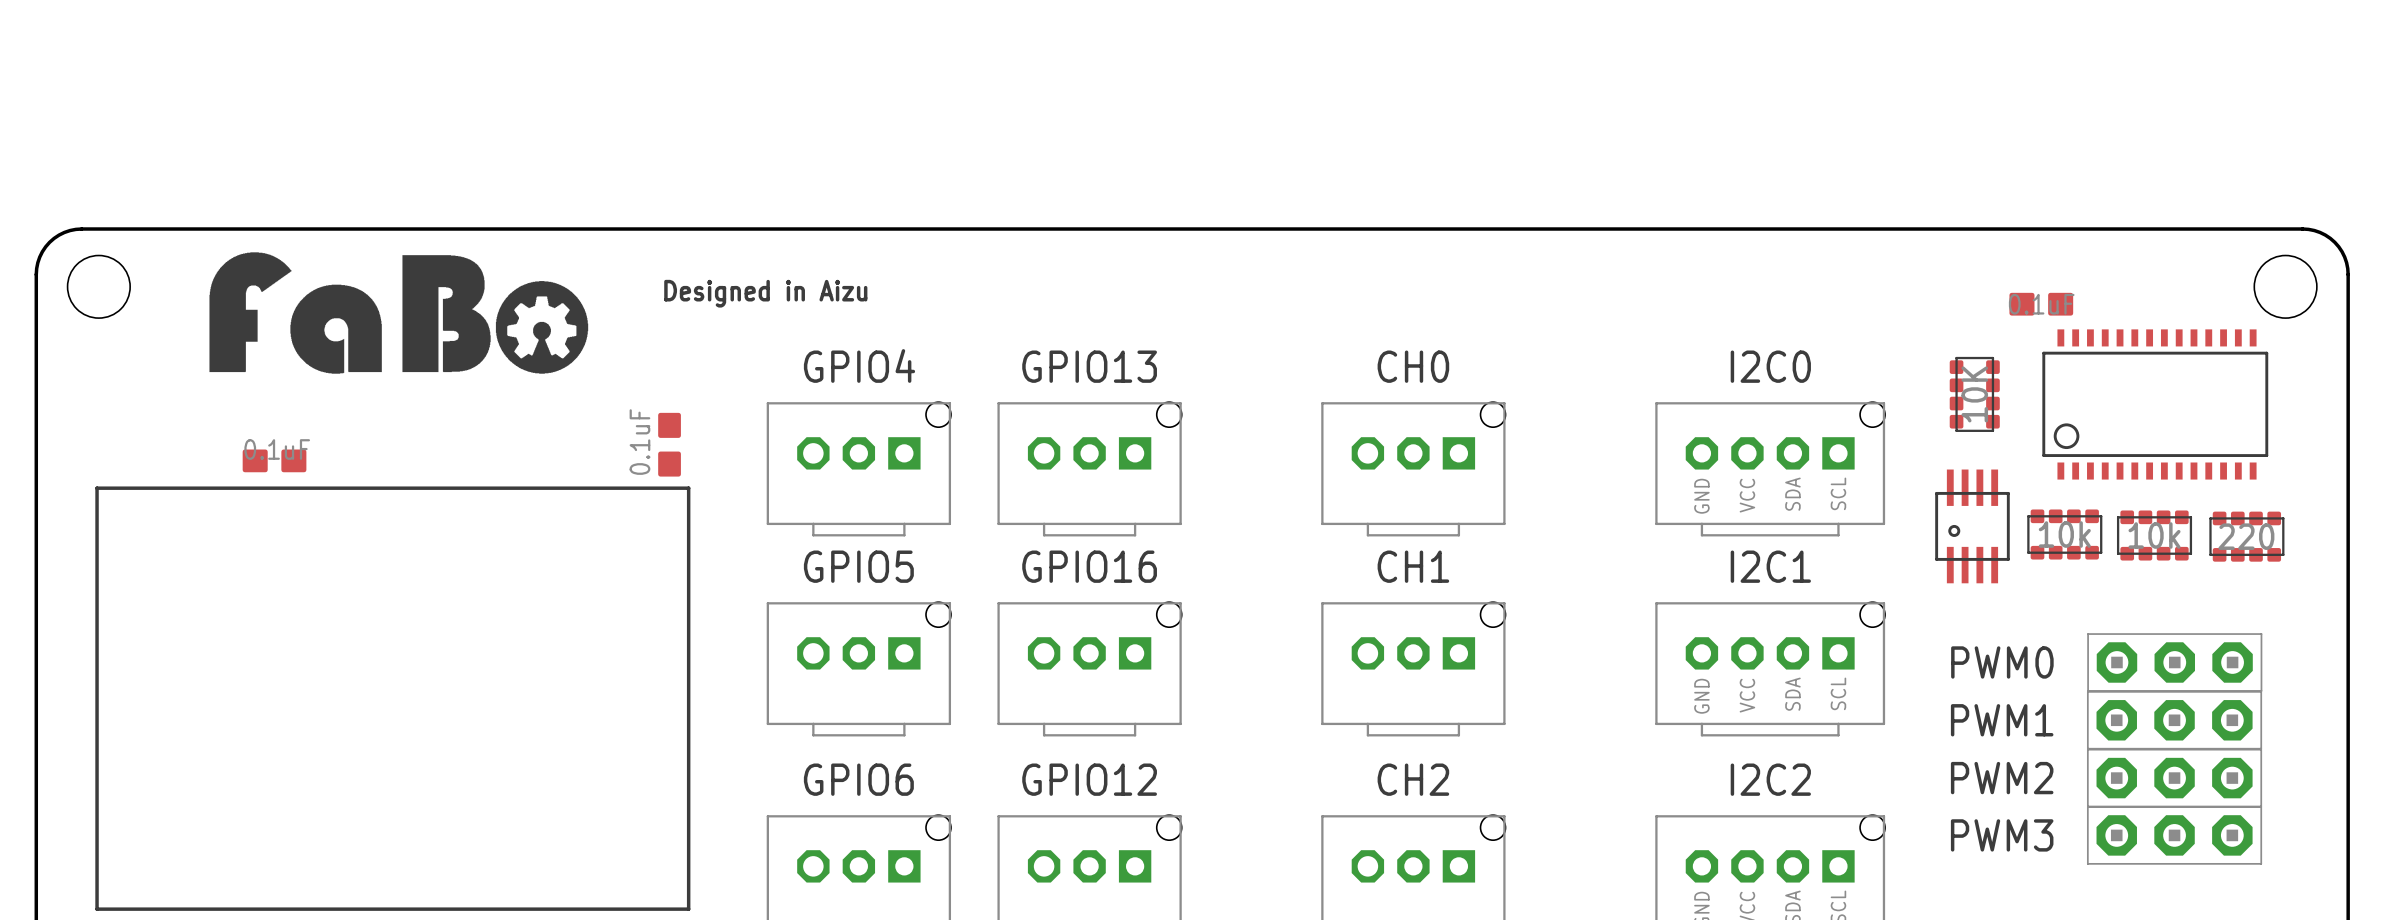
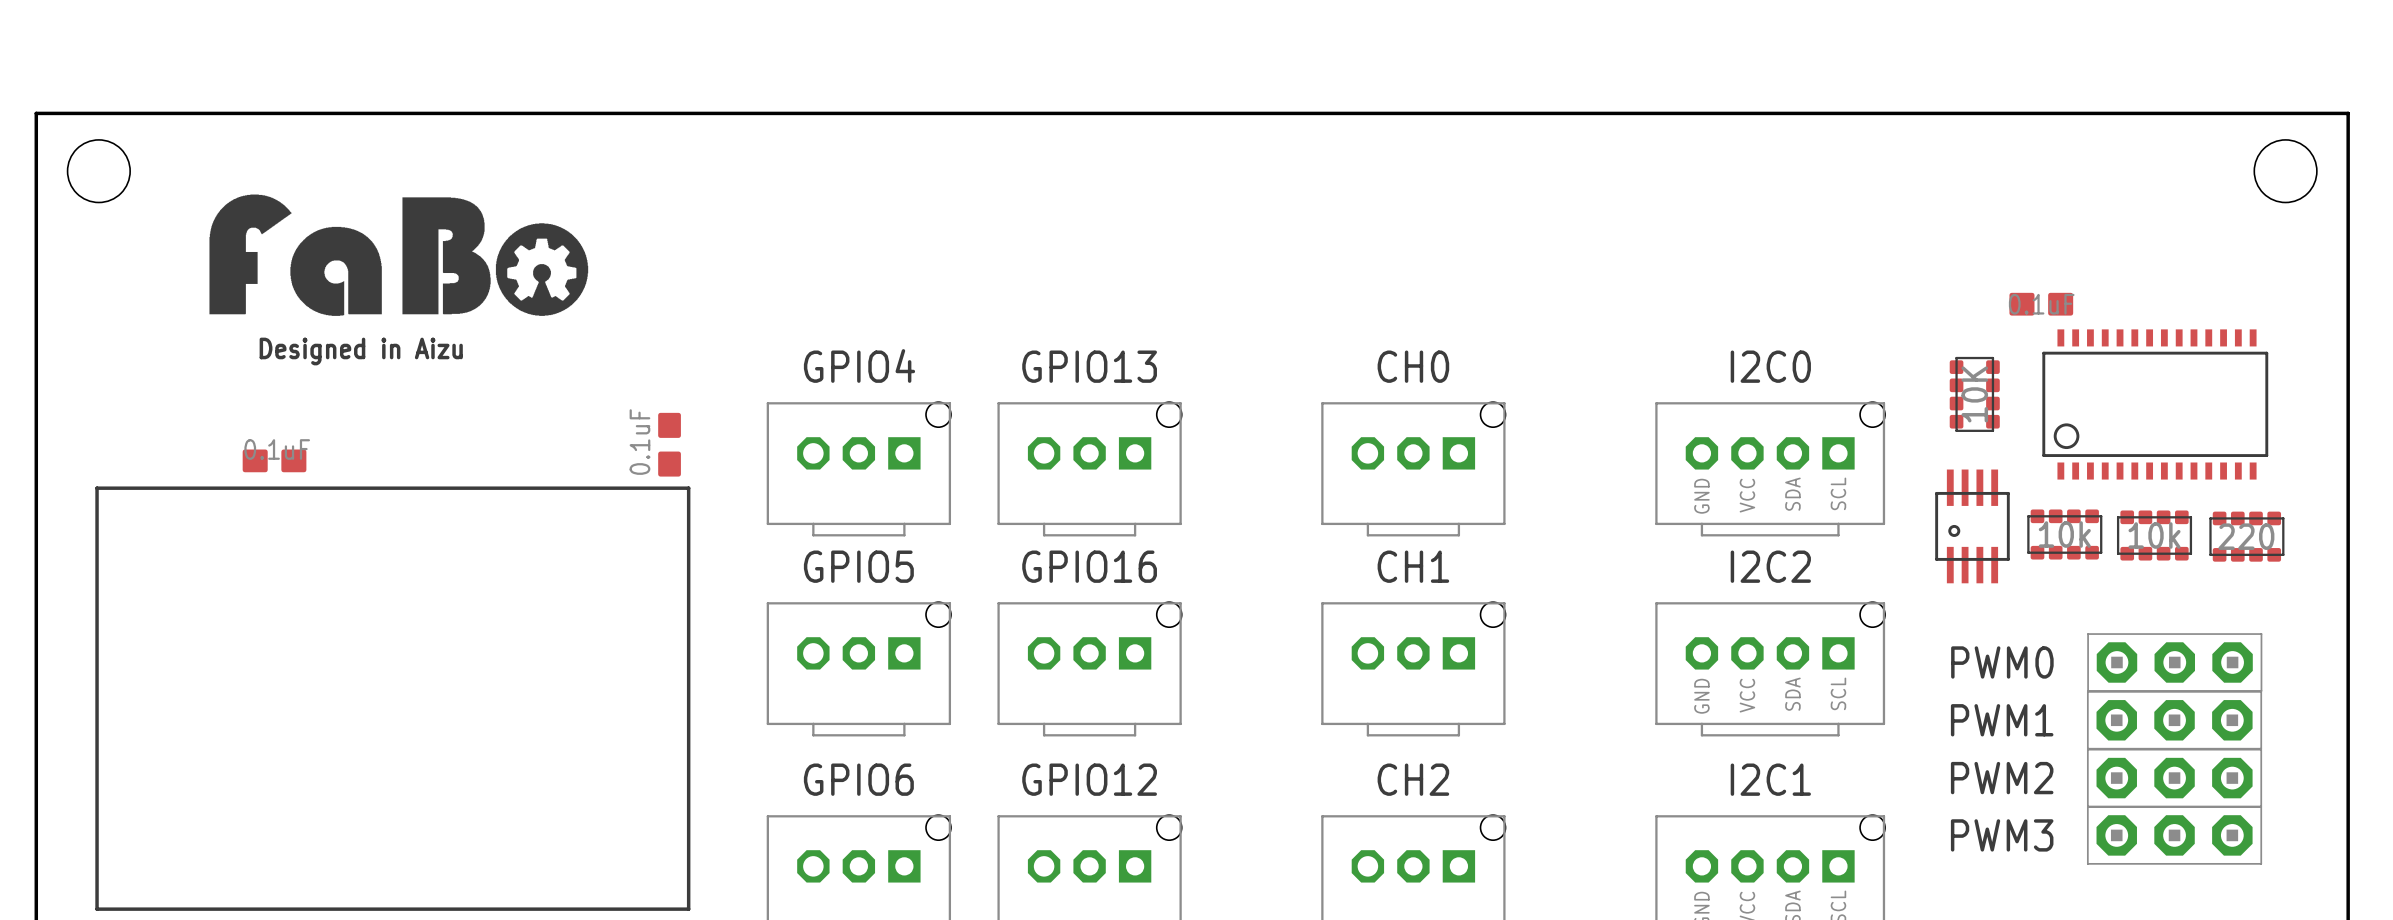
board edge: (36, 274) (39, 257) (49, 242) (64, 232) (81, 229) (2302, 229) (2320, 232) (2334, 242) (2344, 257) (2348, 274) -> (36, 274) (36, 113) (2348, 113) (2348, 274)
round board edge position: (98, 286) -> (98, 171)
round board edge position: (2285, 286) -> (2285, 171)
text position: Designed in Aizu (765, 293) -> Designed in Aizu (361, 351)
drawing position: (398, 313) -> (398, 255)
I2C1 name: I2C1 (1770, 566) -> I2C2 (1770, 566)
I2C2 name: I2C2 (1770, 779) -> I2C1 (1770, 779)

